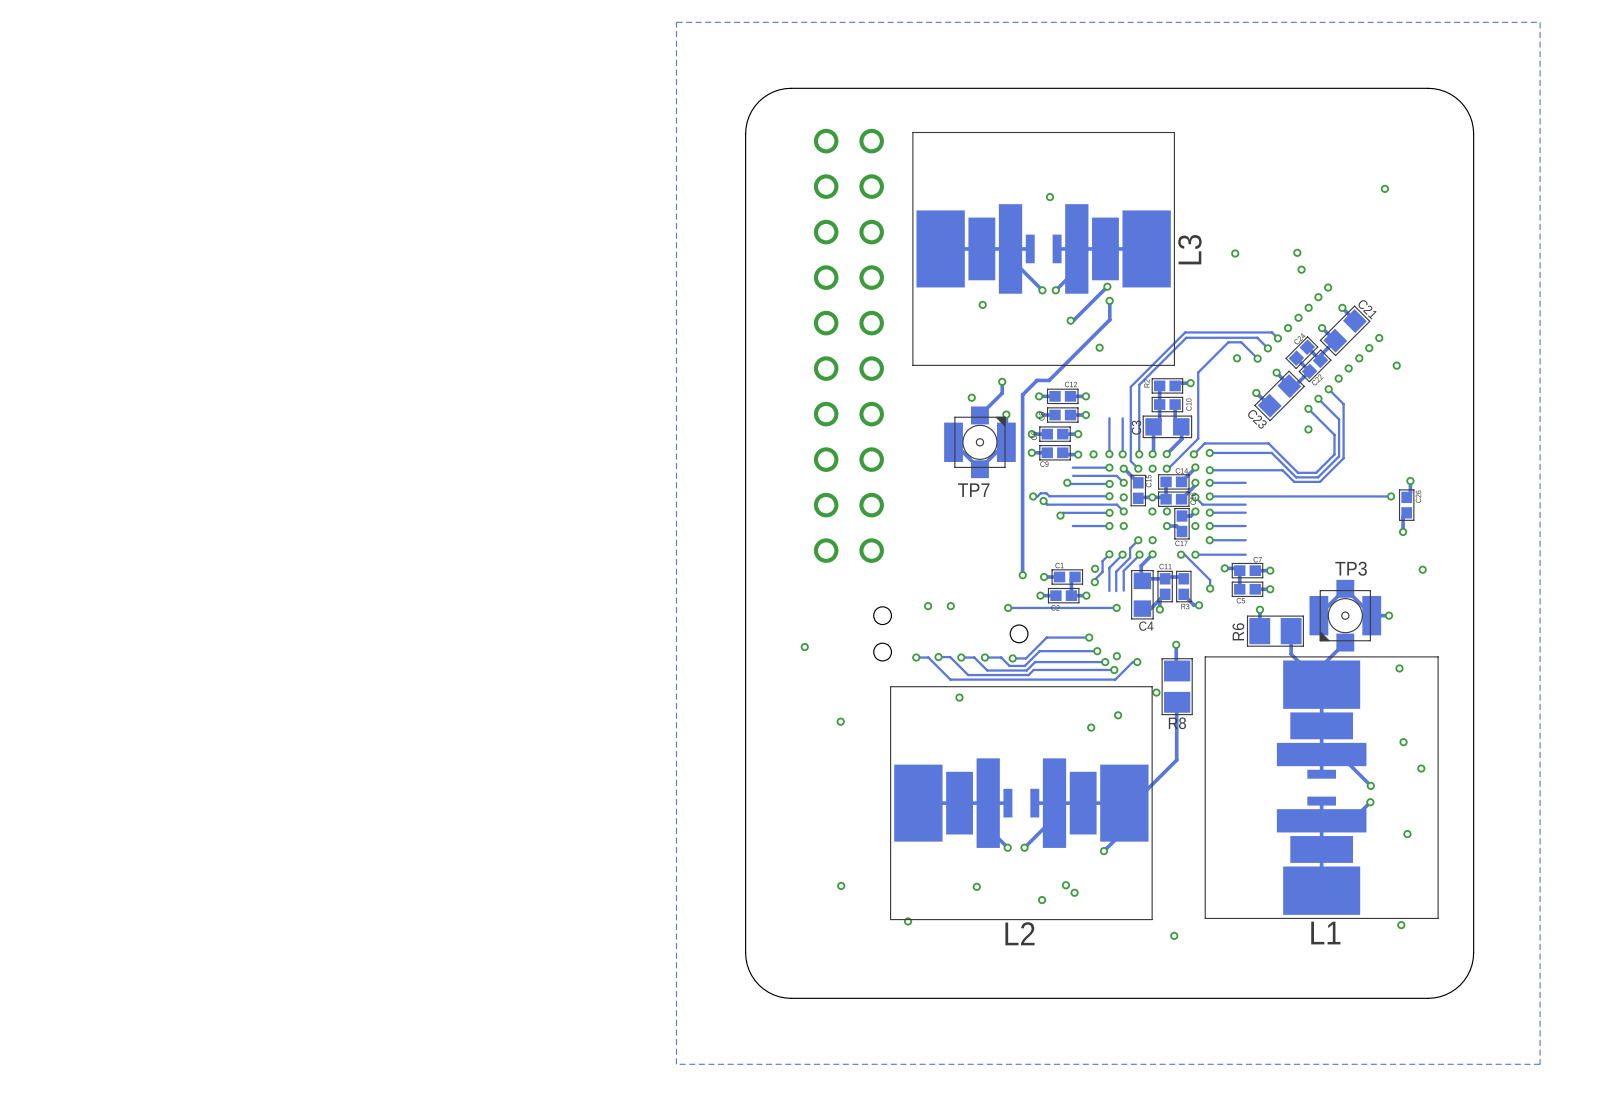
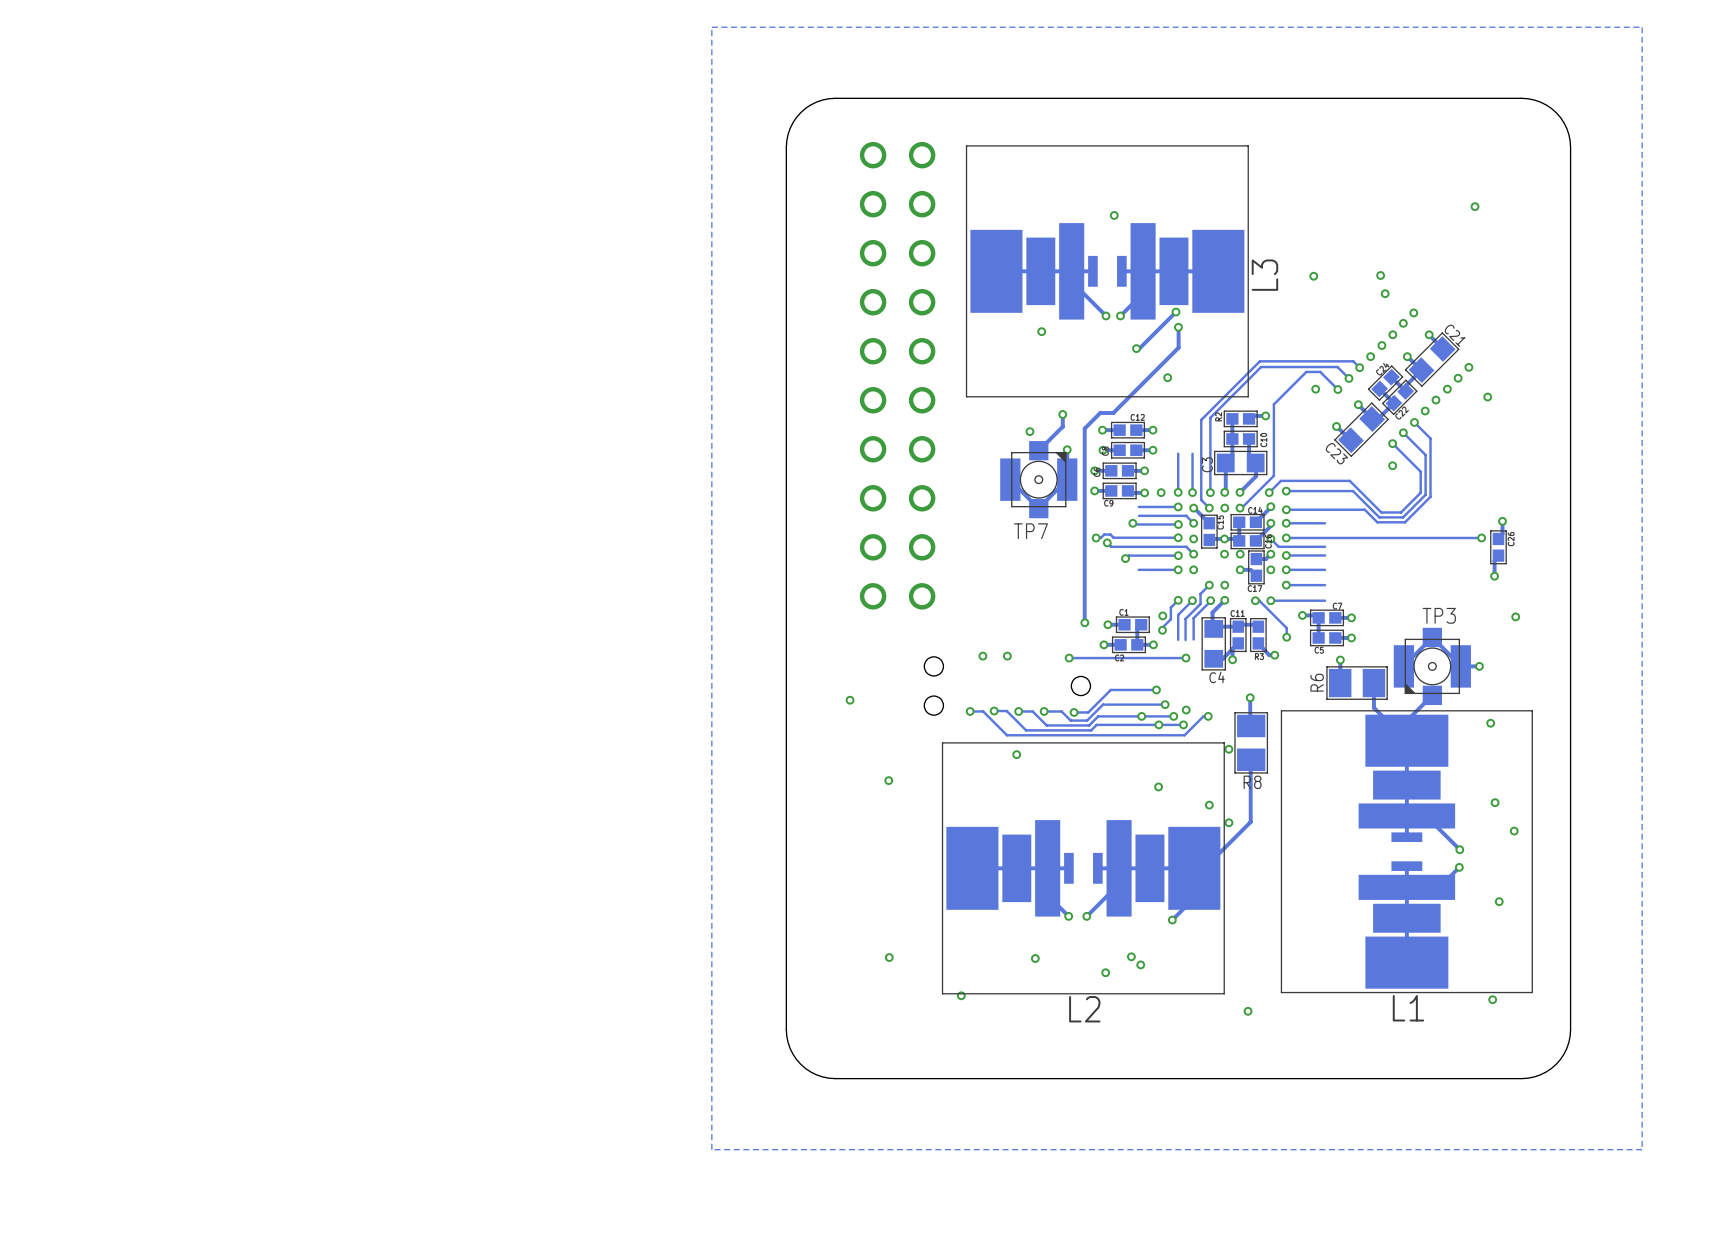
via: none -> (1141, 716)
via: none -> (1158, 724)
via: (1118, 715) -> none
via: none -> (1209, 805)
via: none -> (1228, 822)

